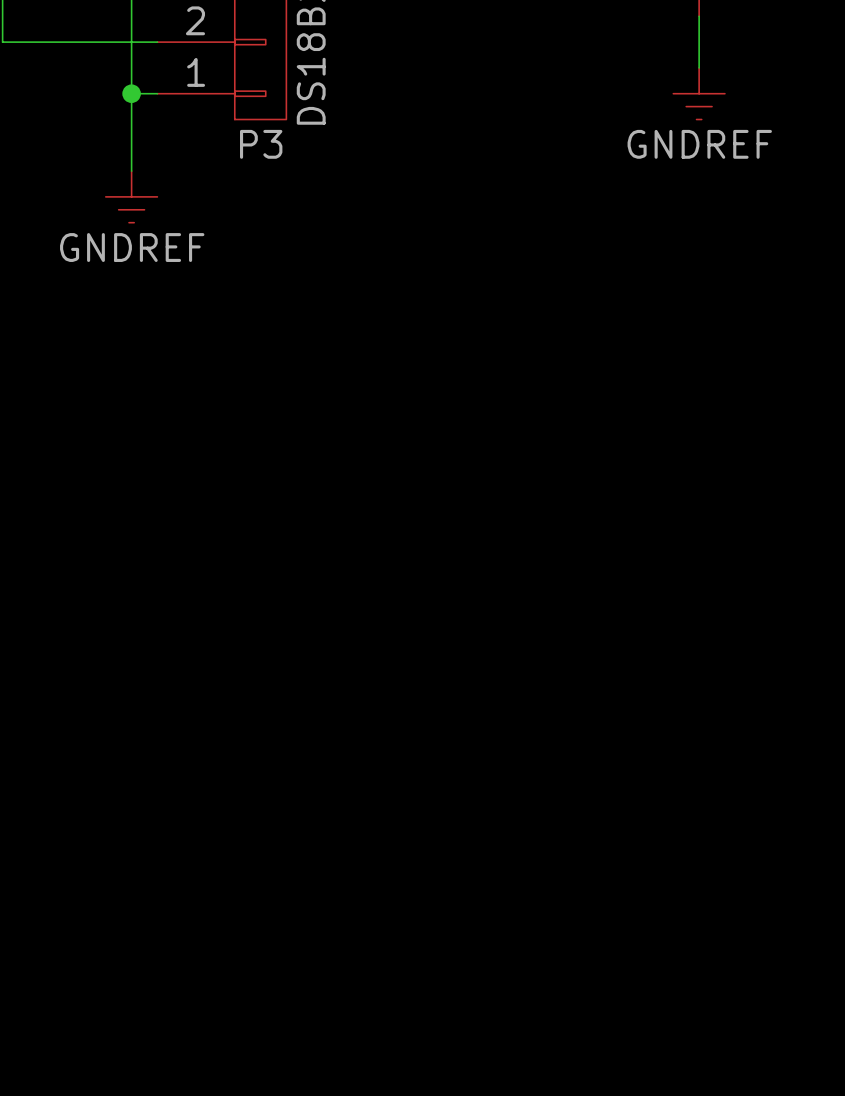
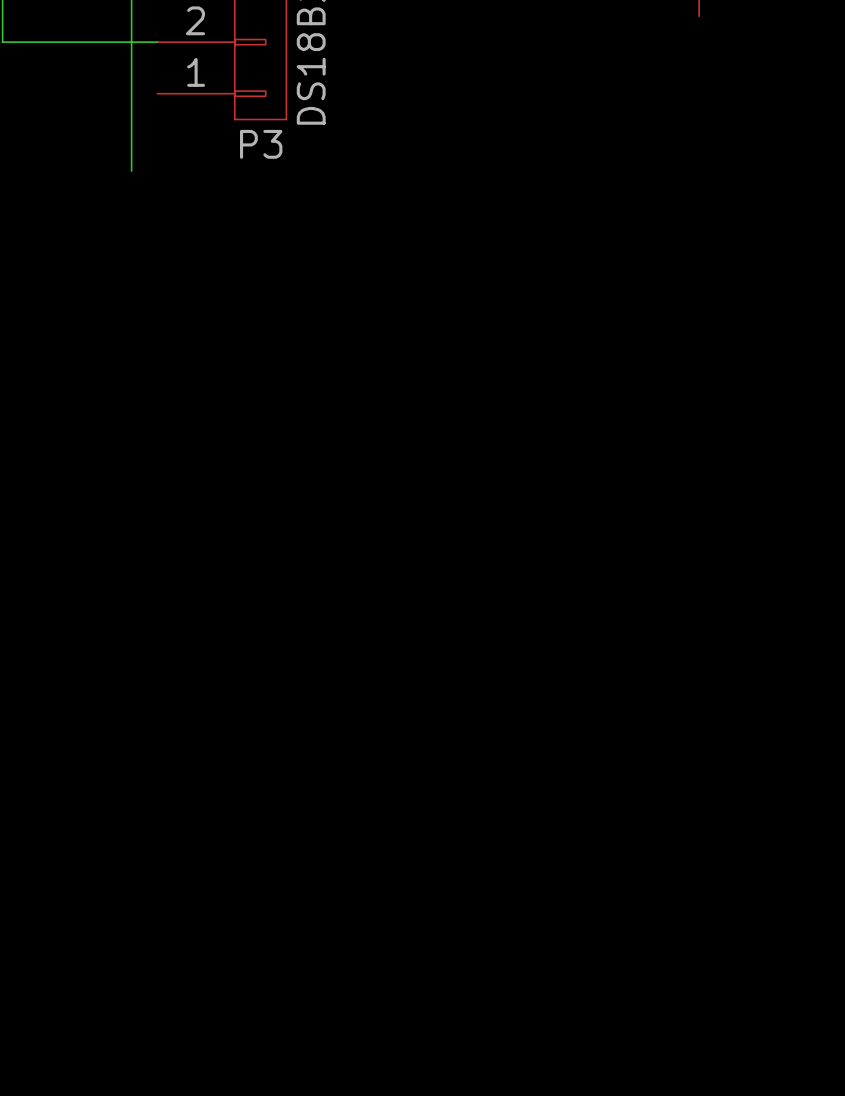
wire: (699, 16) (699, 67) -> none
wire: (131, 93) (157, 93) -> none
junction: (131, 93) -> none
power symbol: GNDREF (699, 93) -> none
power symbol: GNDREF (131, 196) -> none

